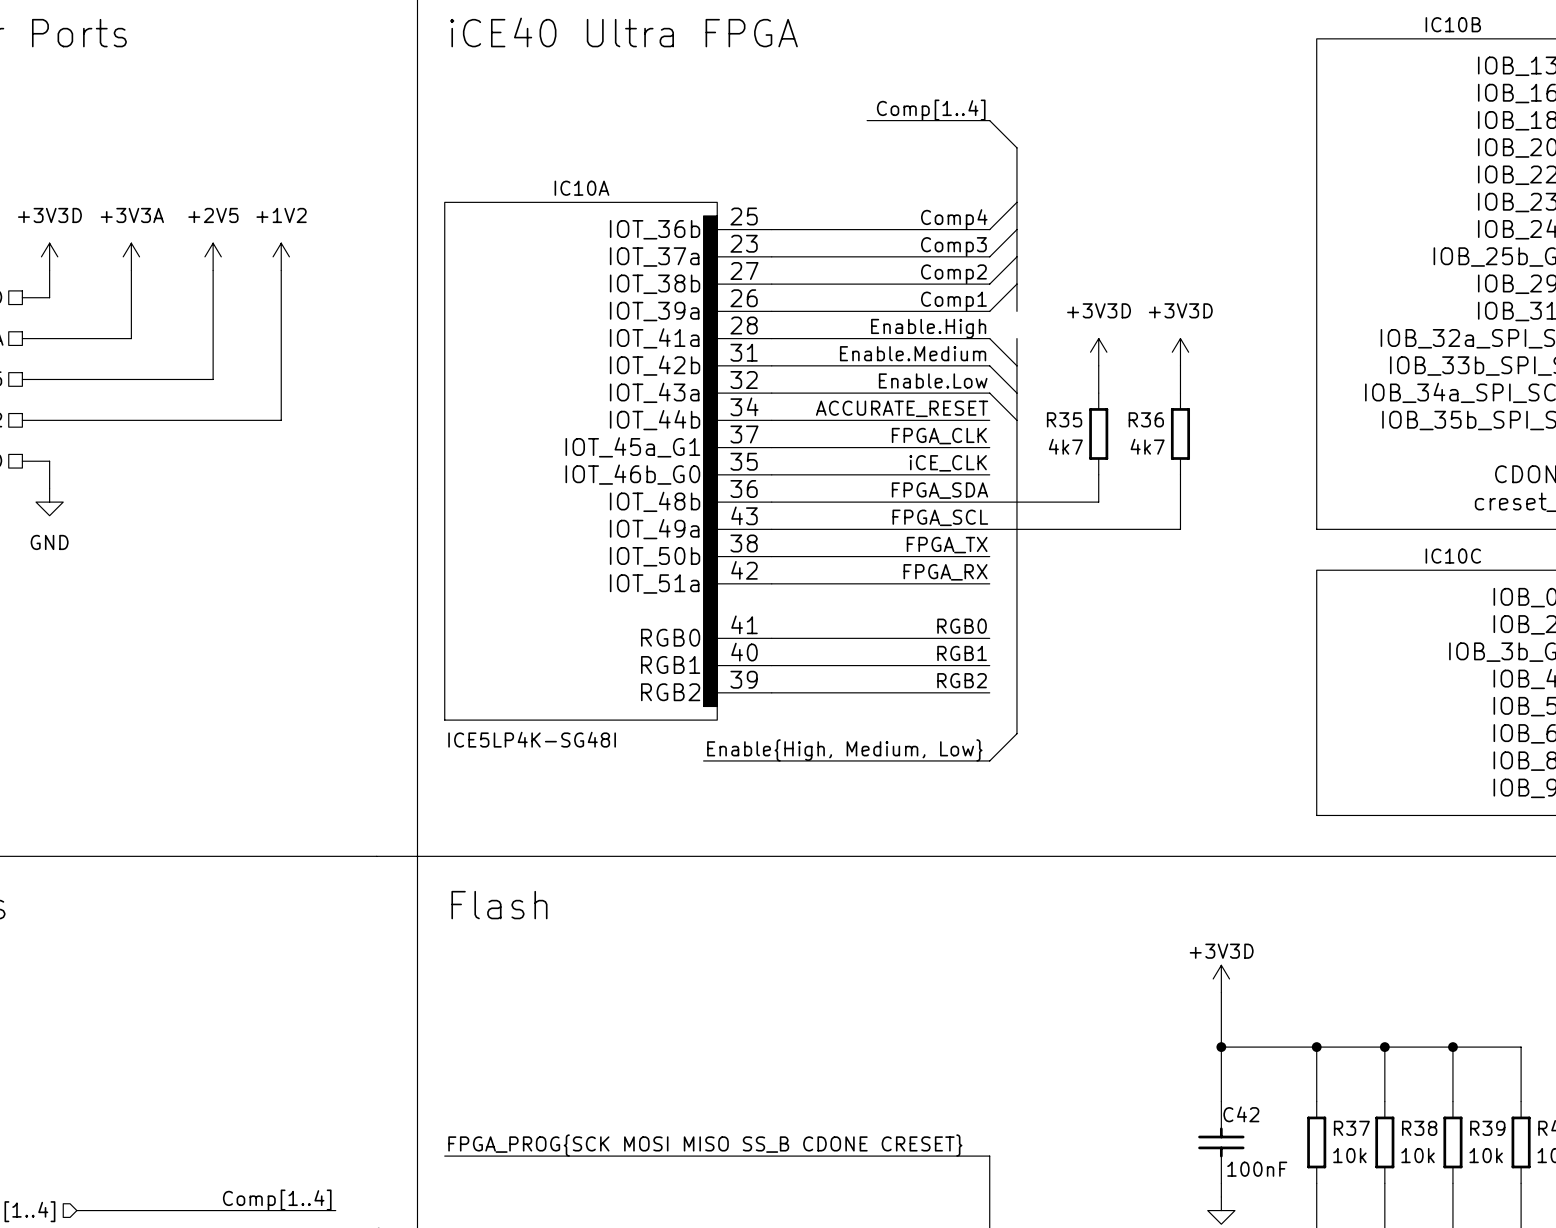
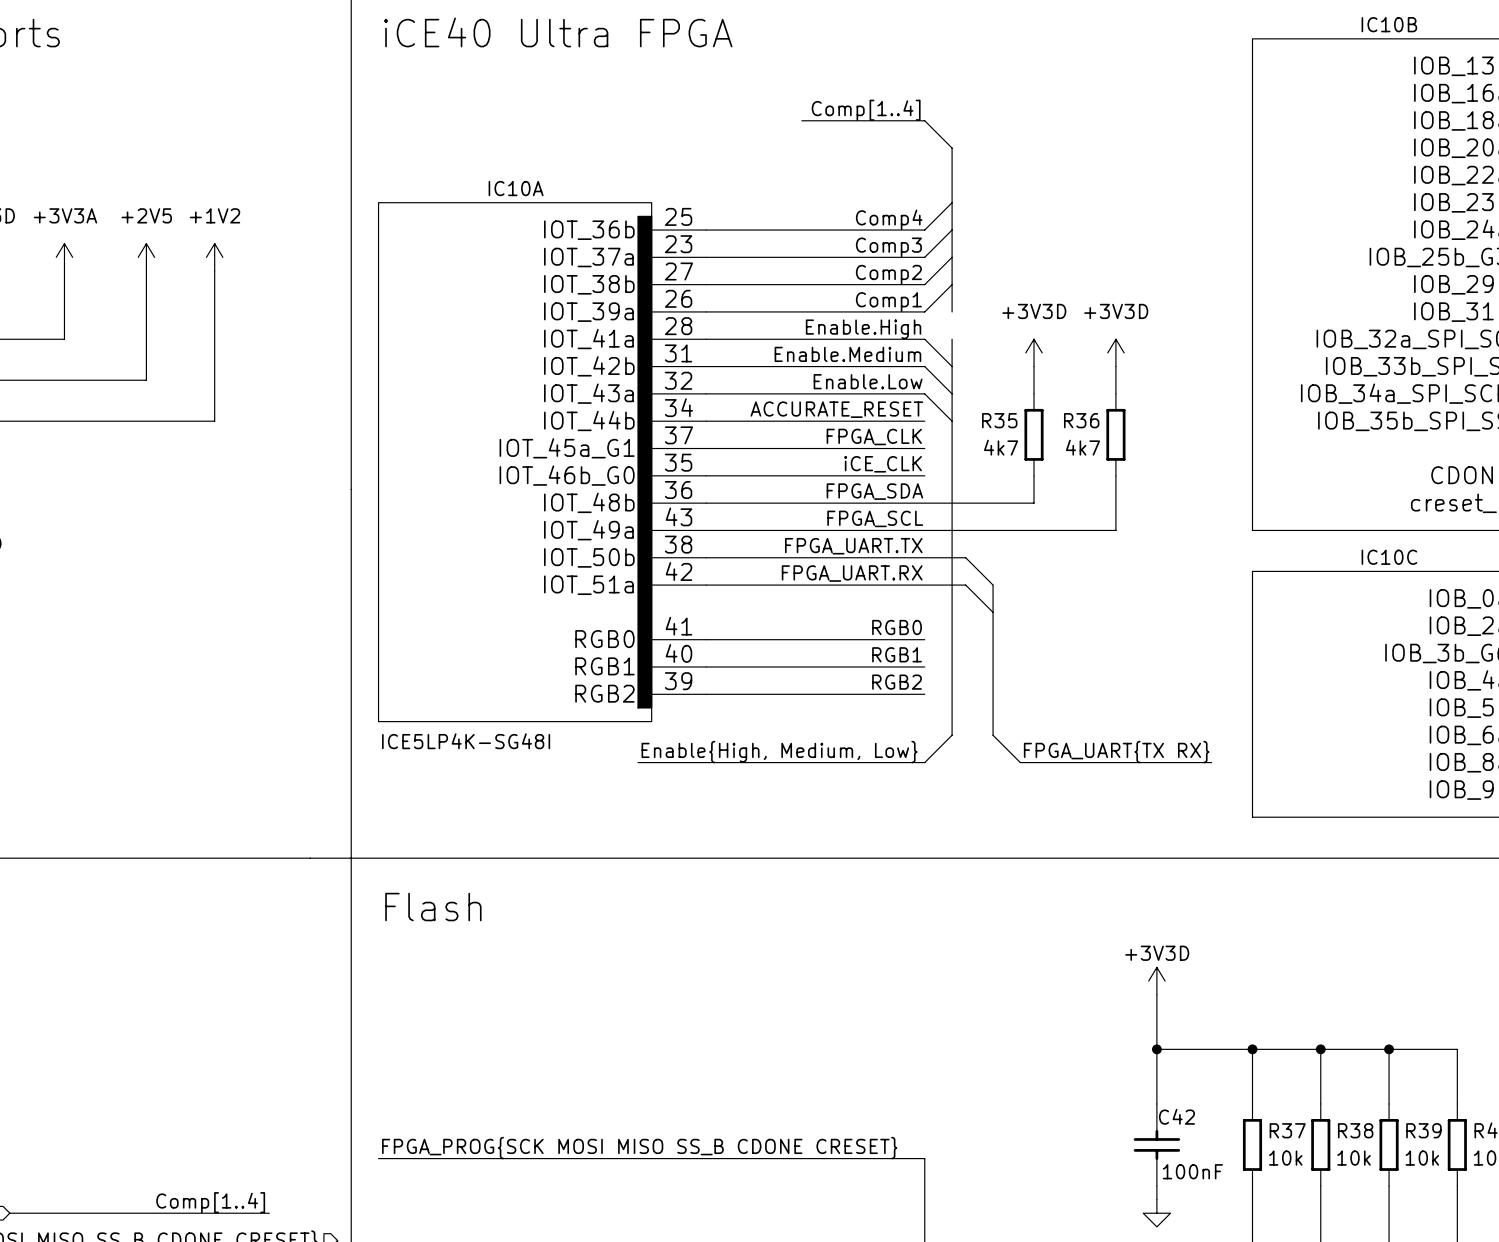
label: FPGA_TX (947, 545) -> FPGA_UART.TX (853, 546)
wire: none -> (924, 557) (965, 557) (993, 585)
label: FPGA_RX (945, 572) -> FPGA_UART.RX (852, 573)
wire: none -> (924, 585) (965, 585) (993, 612)
bus: none -> (993, 585) (993, 735) (1020, 762) (1211, 762)
label: none -> FPGA_UART{TX RX} (1116, 752)

